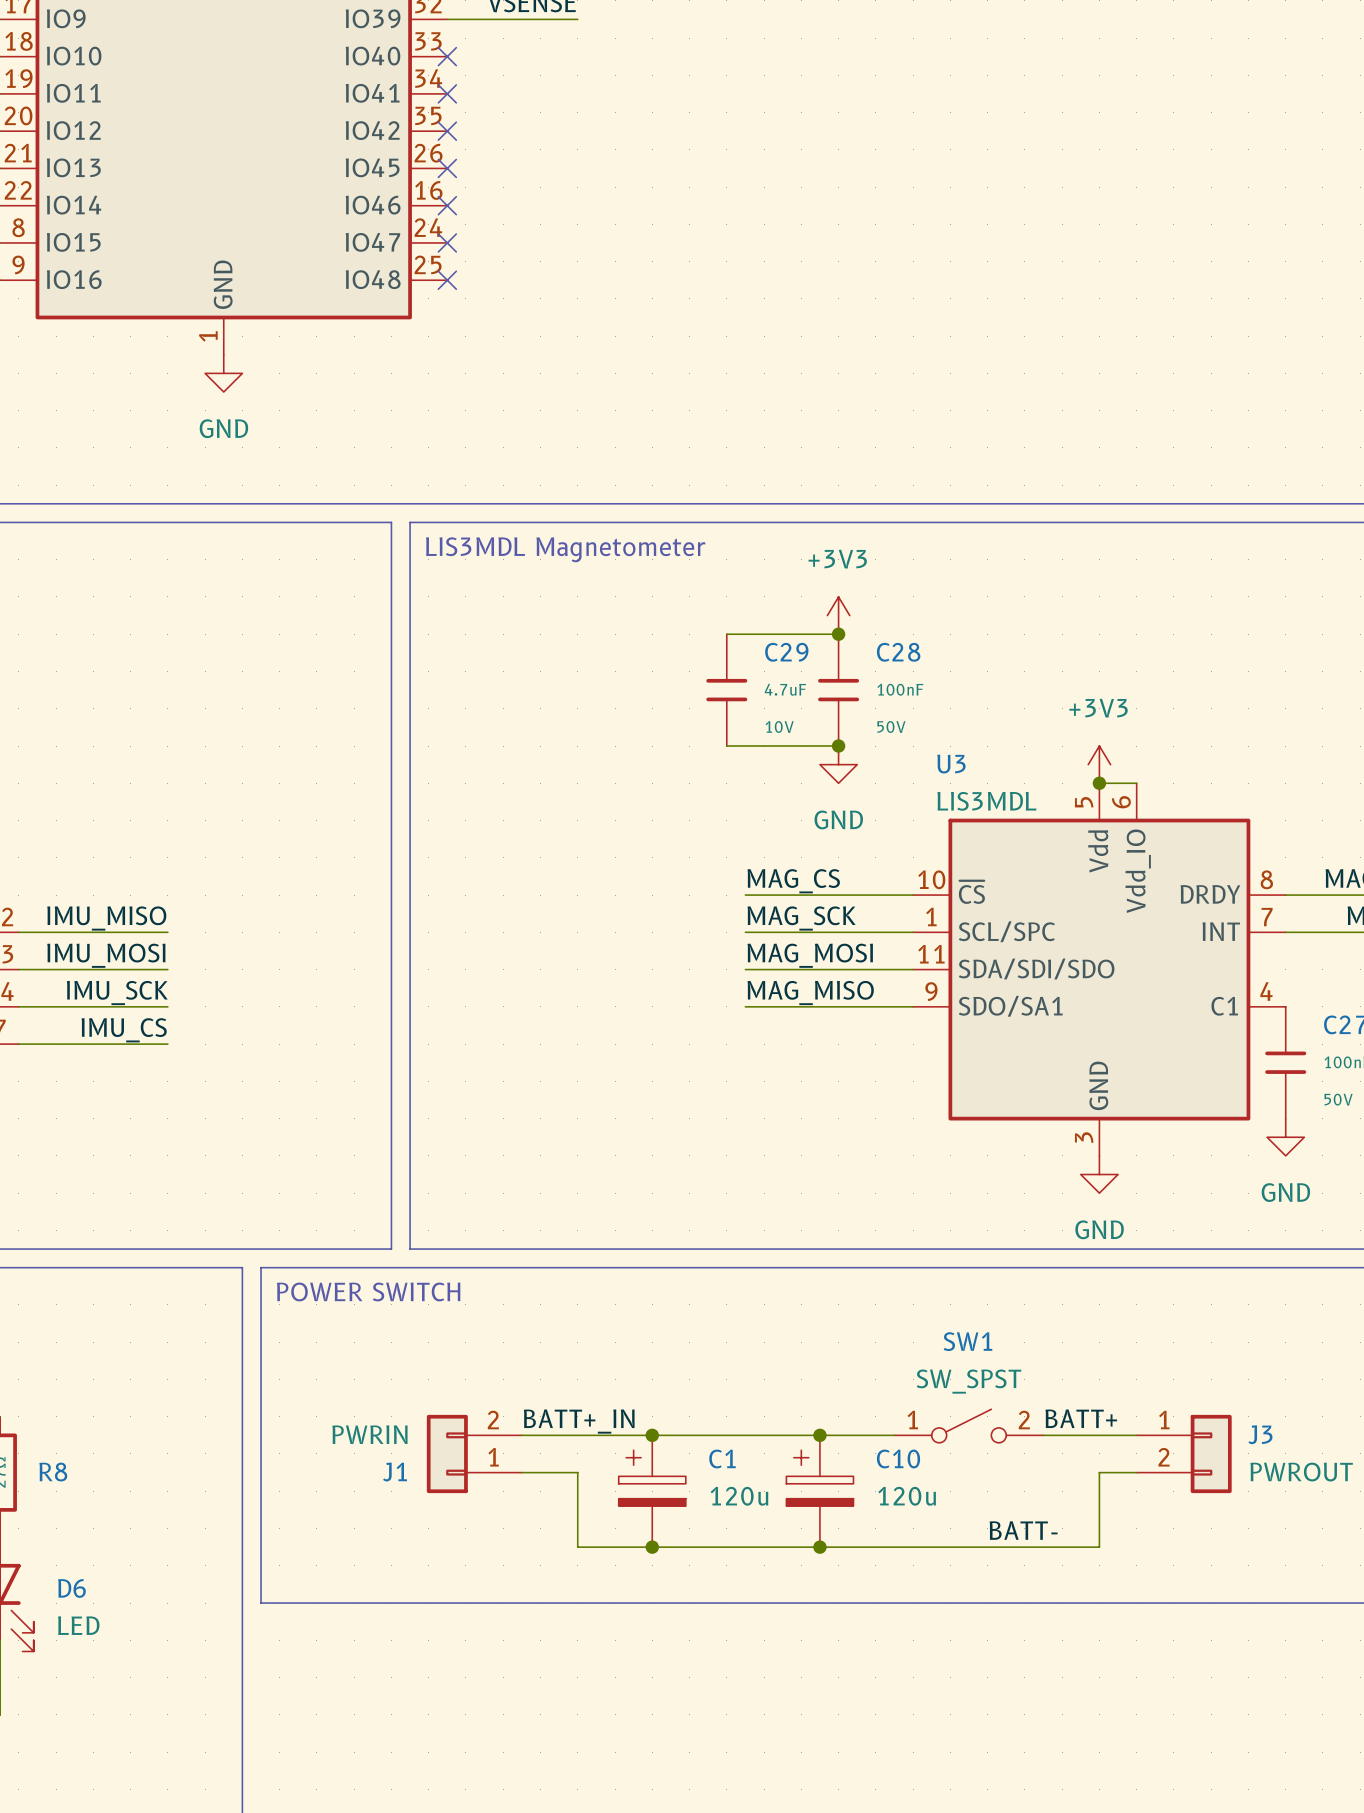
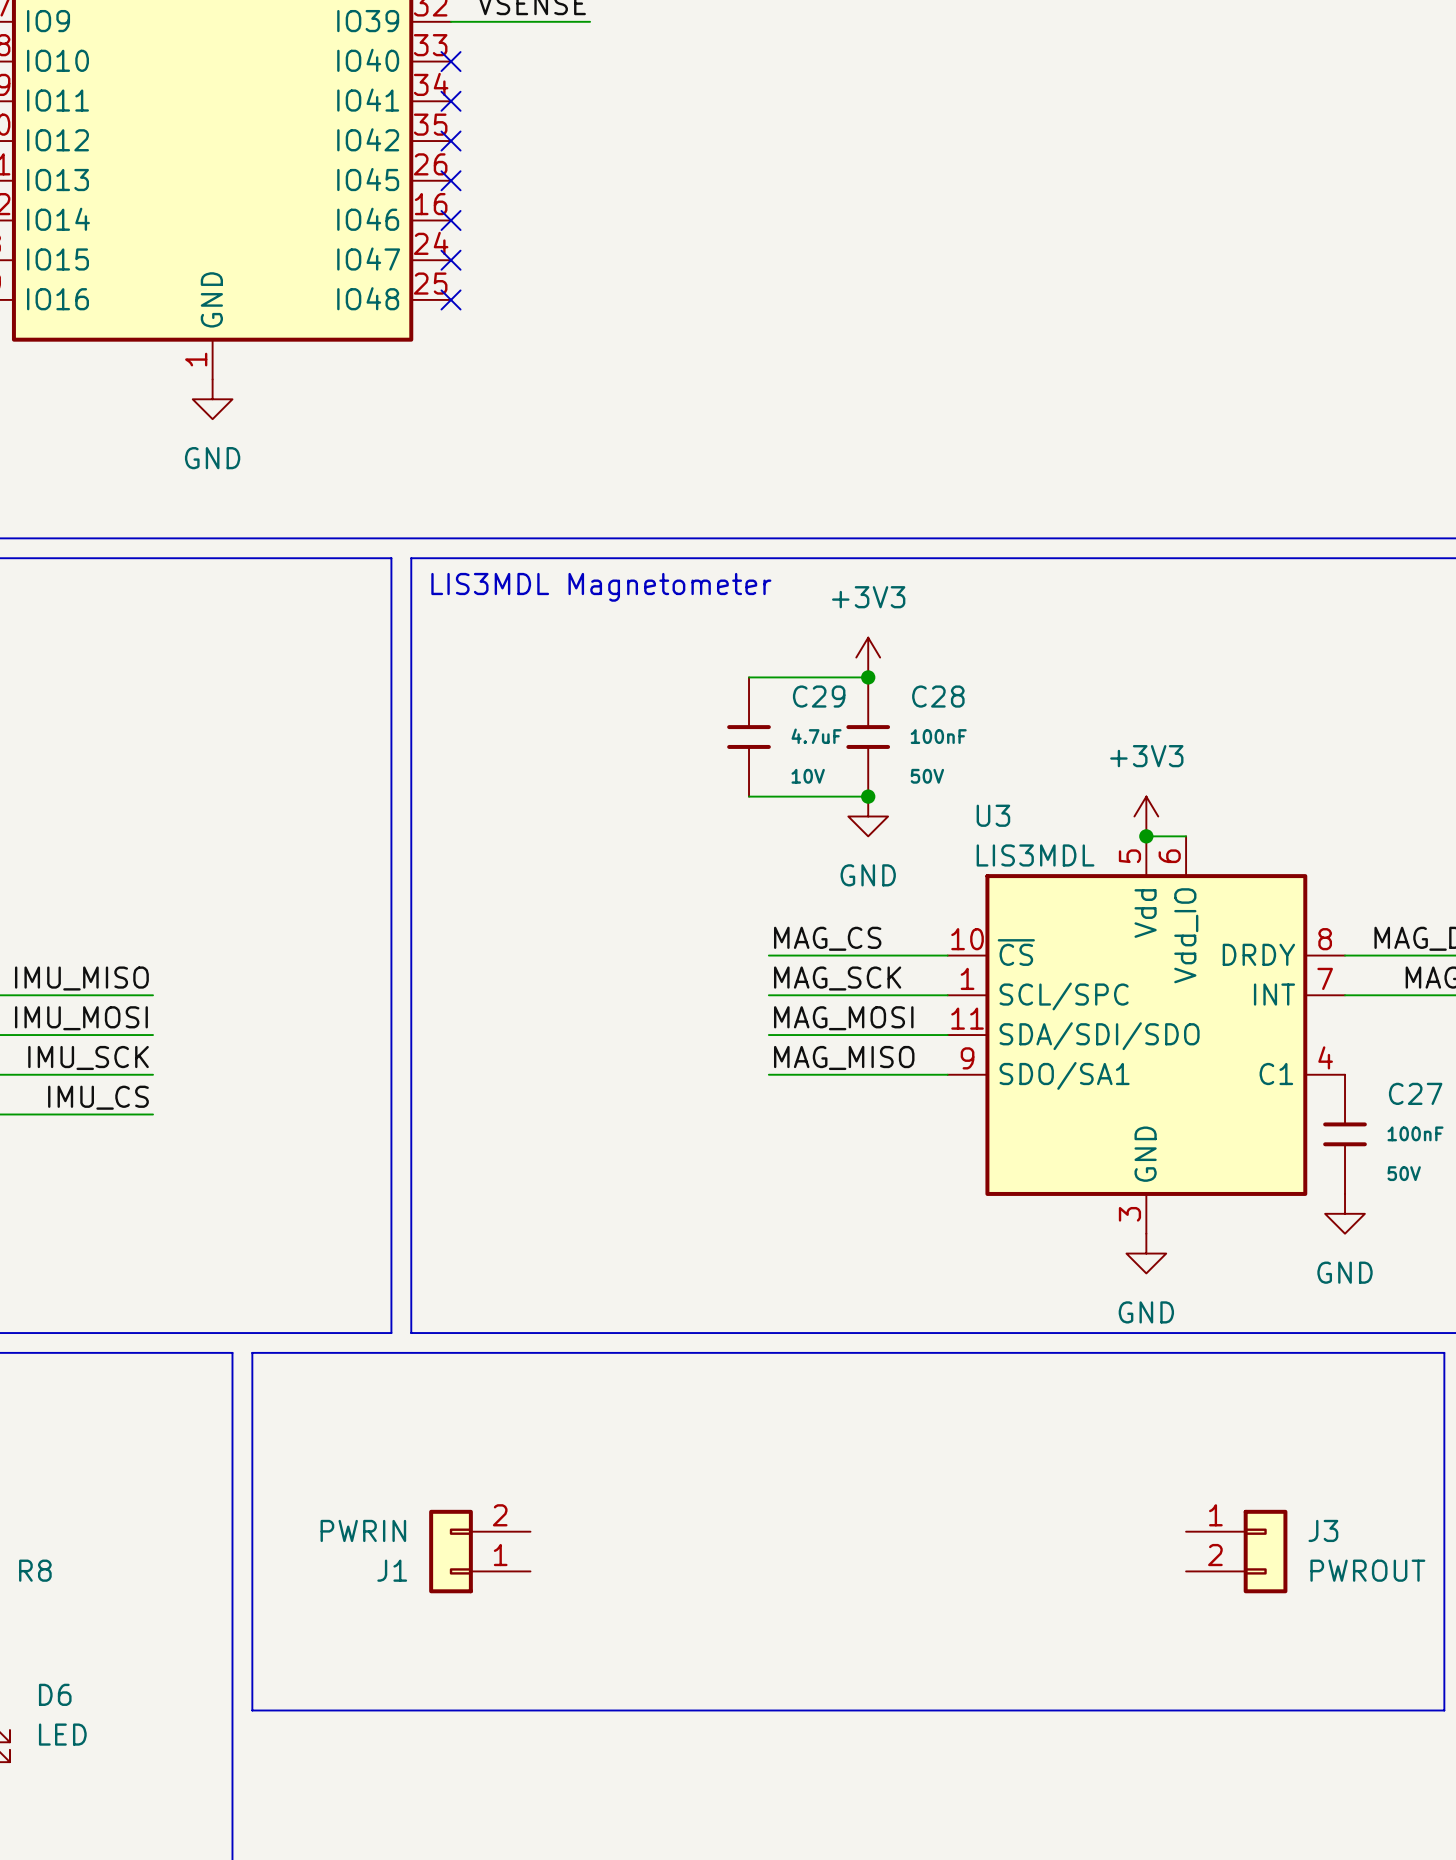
text: POWER SWITCH (368, 1291) -> none
label: BATT+ (1081, 1418) -> none
label: BATT+_IN (579, 1421) -> none
SW1: SW_SPST (968, 1426) -> none
wire: (521, 1435) (894, 1435) -> none
junction: (652, 1435) -> none
junction: (819, 1435) -> none
wire: (1043, 1435) (1136, 1435) -> none
wire: (521, 1472) (577, 1472) (577, 1547) (1099, 1547) (1099, 1472) (1136, 1472) -> none
C1: 120u (652, 1491) -> none
C10: 120u (819, 1491) -> none
label: BATT- (1023, 1530) -> none
junction: (652, 1547) -> none
junction: (819, 1547) -> none

